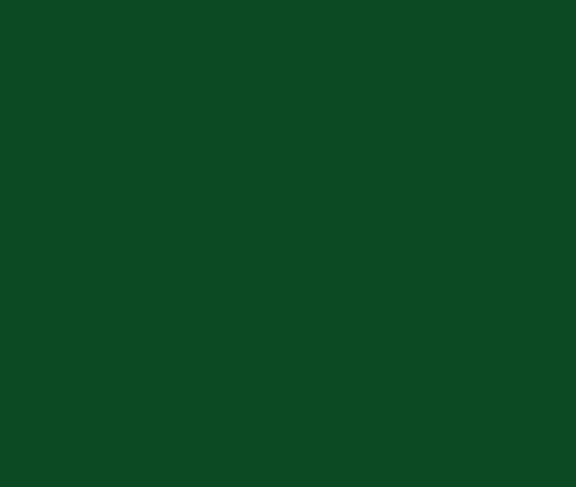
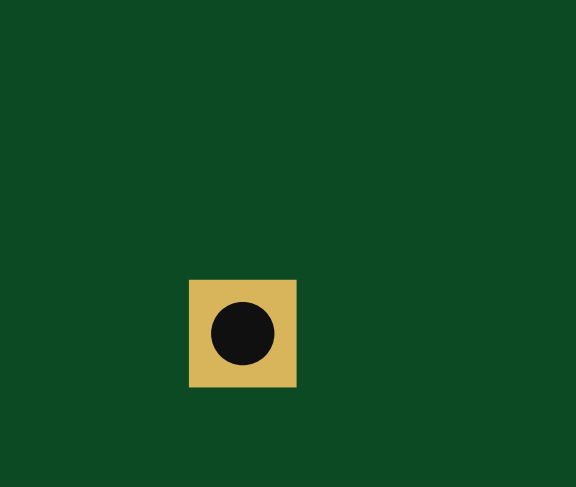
part: none -> (242, 333)

